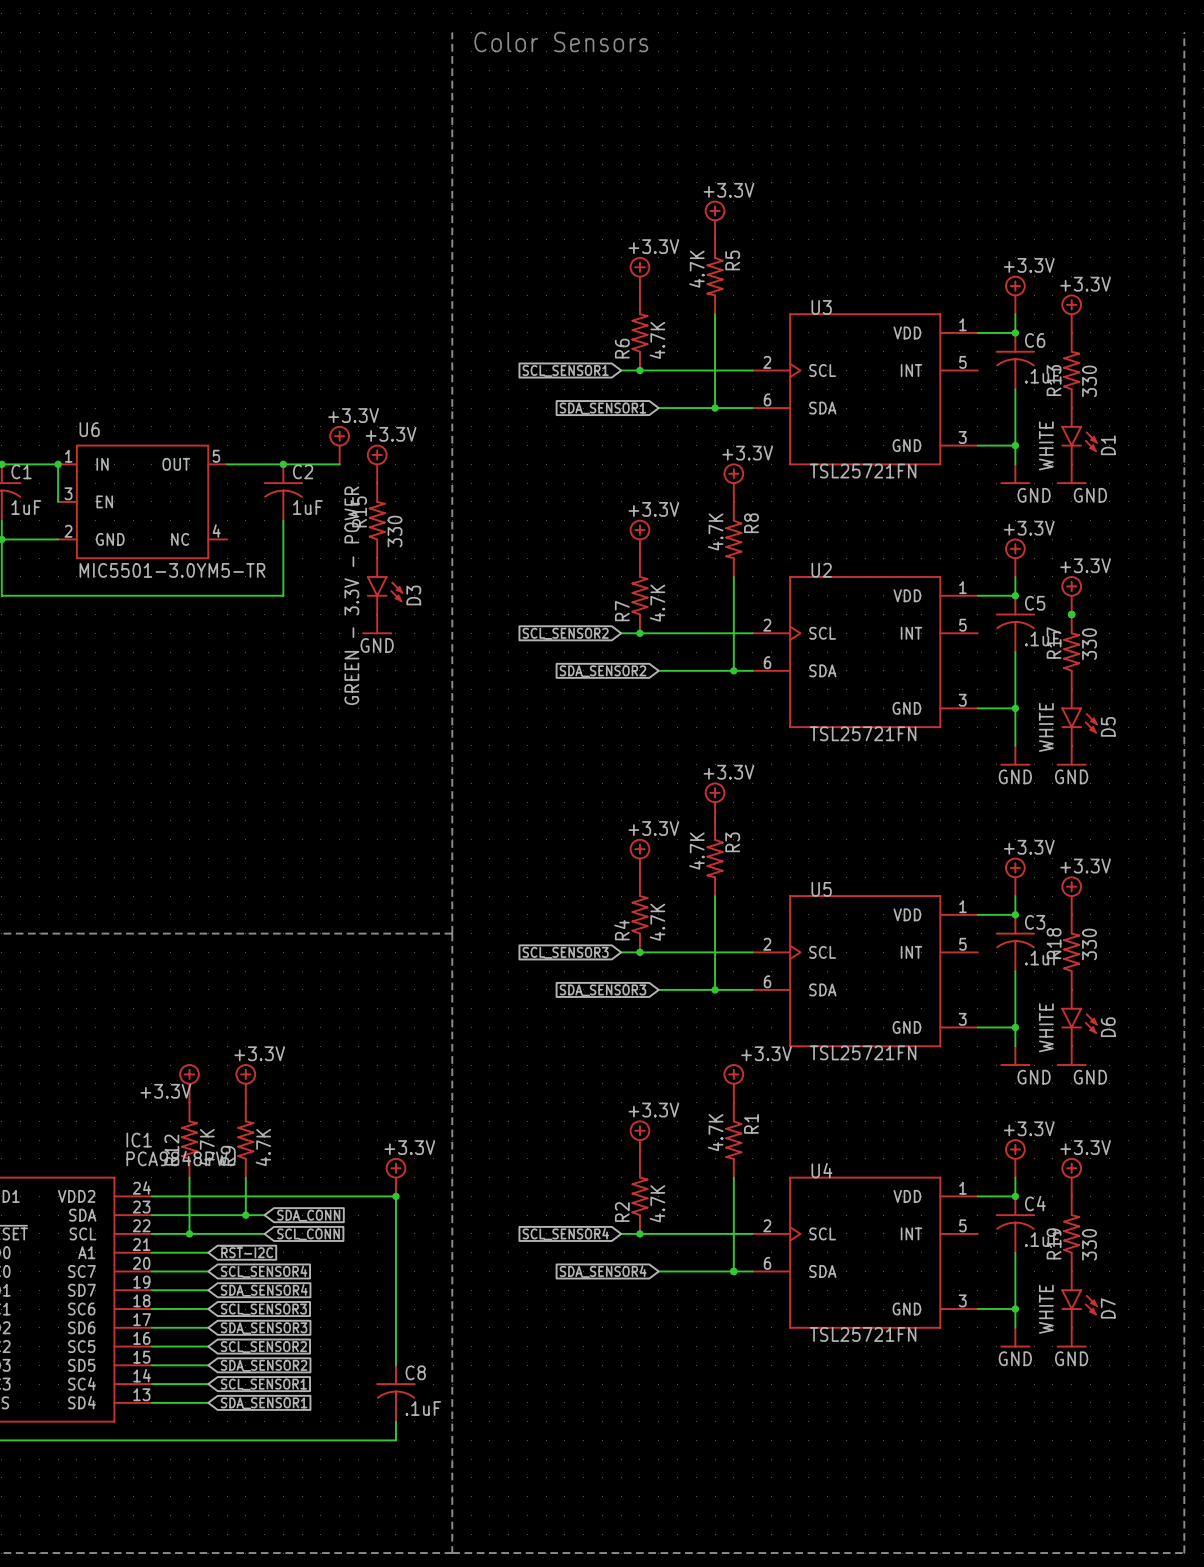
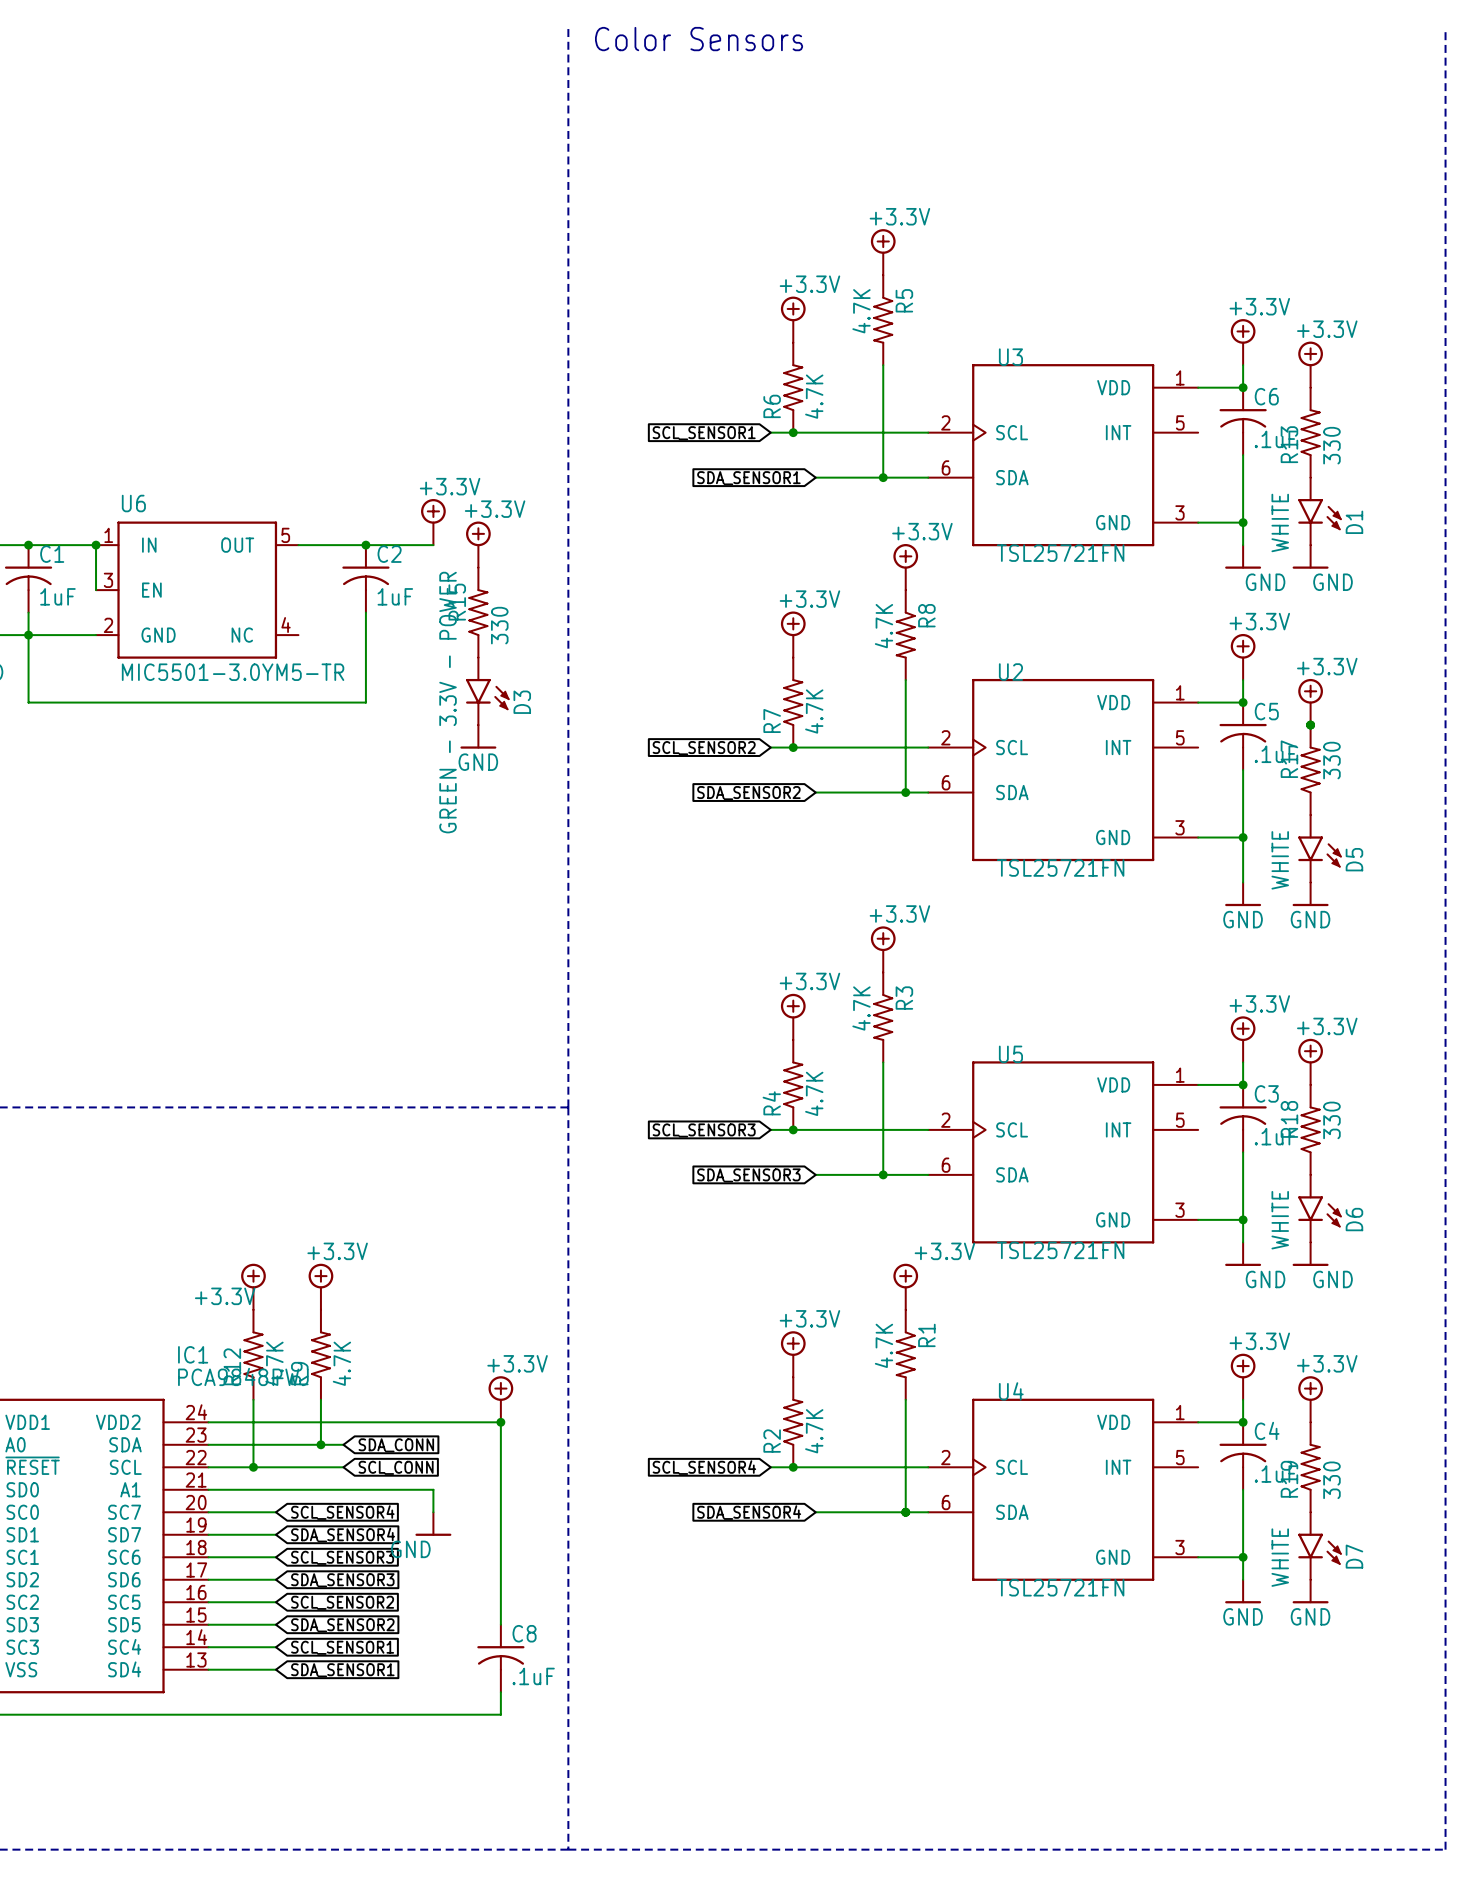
global label: ~{RST}-I2C (246, 1251) -> none
wire: none -> (275, 1489) (433, 1489) (433, 1512)
power symbol: none -> GND (433, 1524)

